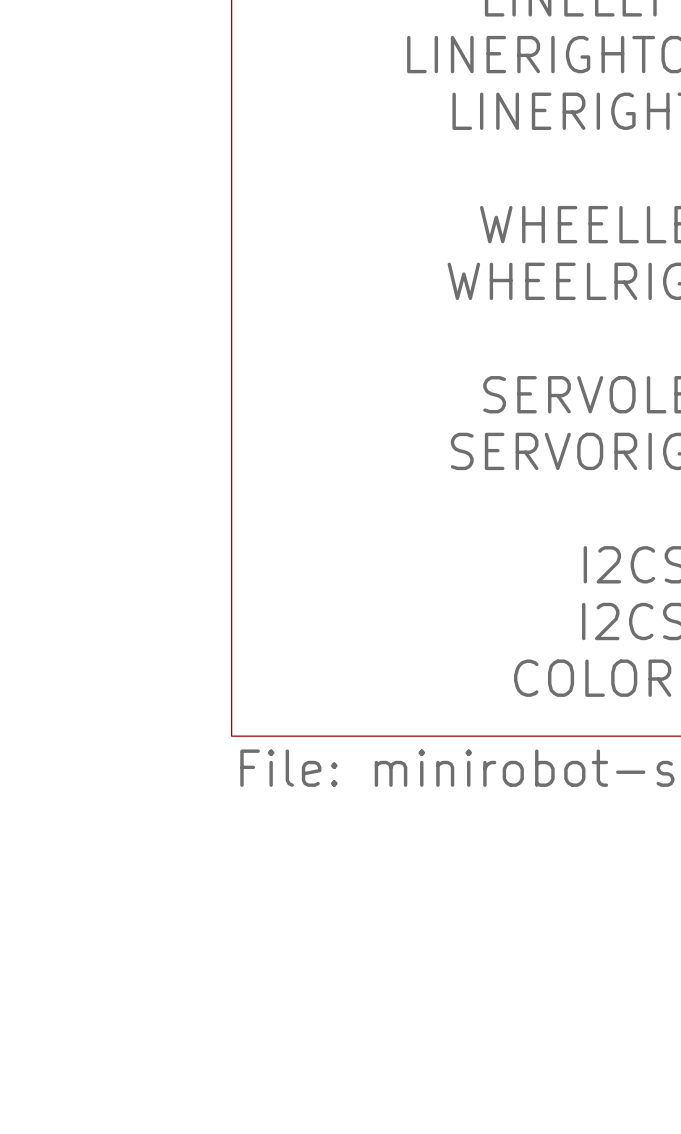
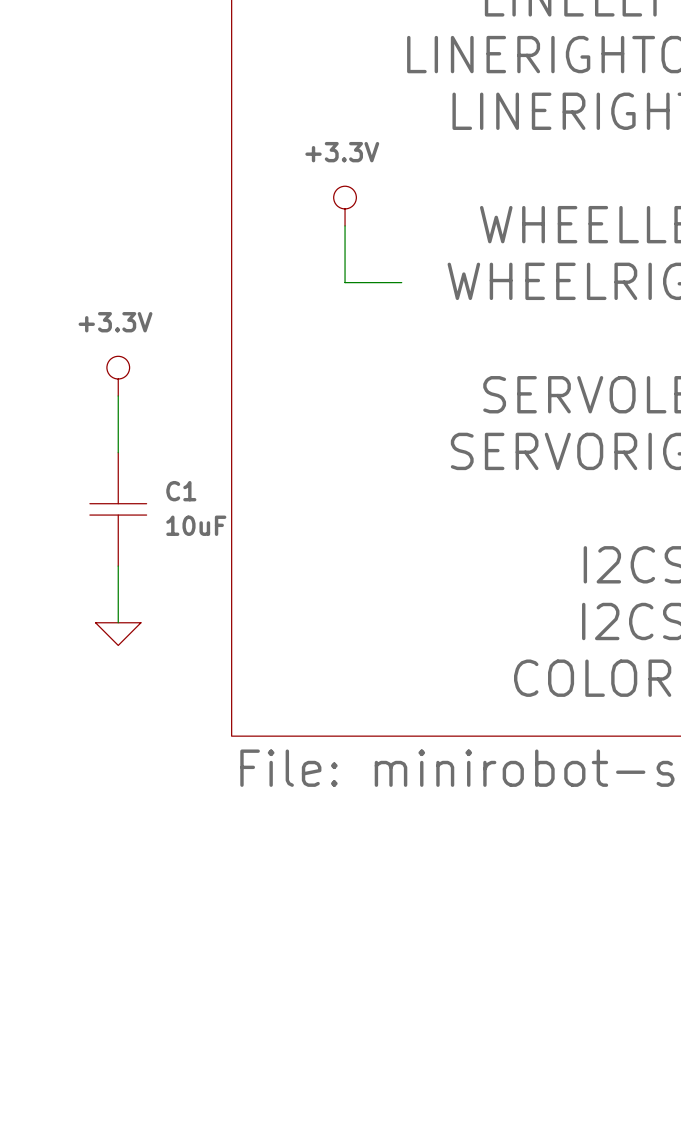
power symbol: none -> +3.3V (345, 206)
wire: none -> (345, 225) (345, 282) (401, 282)
power symbol: none -> +3.3V (118, 376)
wire: none -> (118, 396) (118, 452)
C1: none -> 10uF (118, 509)
wire: none -> (118, 566) (118, 622)
power symbol: none -> (118, 634)

